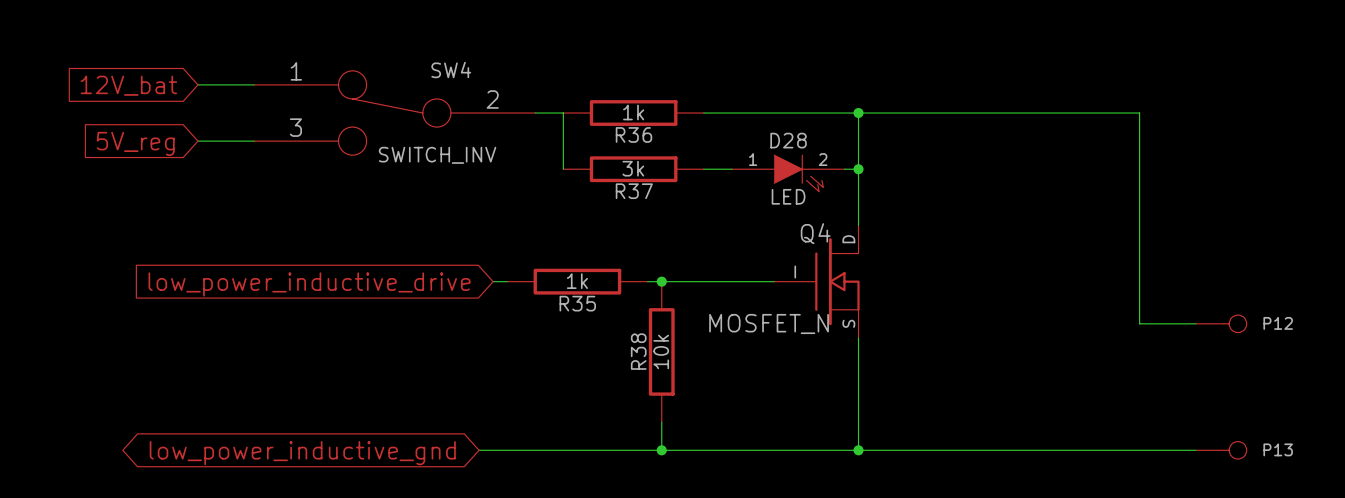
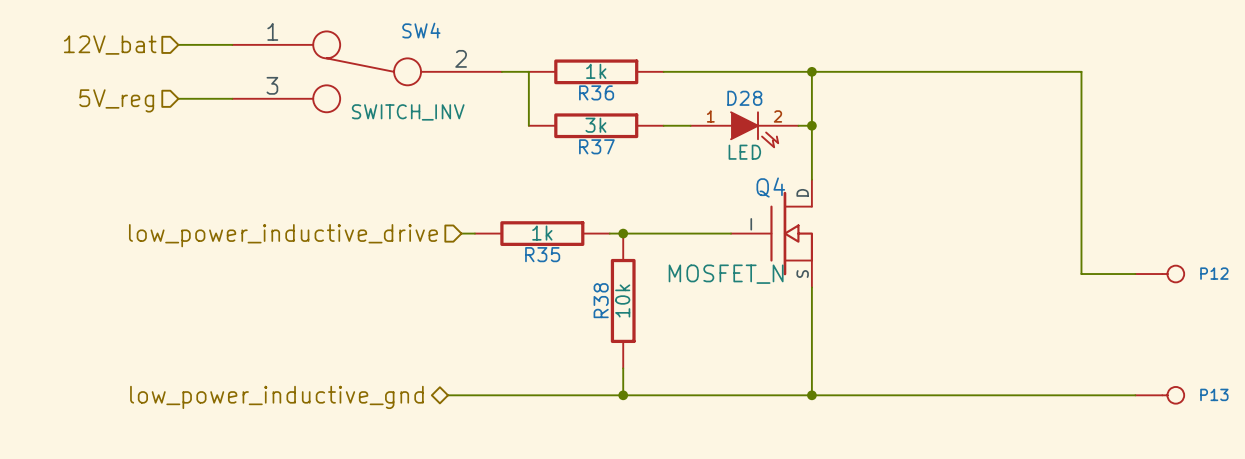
hierarchical label: none -> 12V_bat (110, 45)
global label: 12V_bat (128, 85) -> none
hierarchical label: none -> 5V_reg (116, 100)
global label: 5V_reg (135, 143) -> none
hierarchical label: none -> low_power_inductive_drive (283, 235)
global label: low_power_inductive_drive (309, 284) -> none
hierarchical label: none -> low_power_inductive_gnd (276, 397)
global label: low_power_inductive_gnd (302, 453) -> none

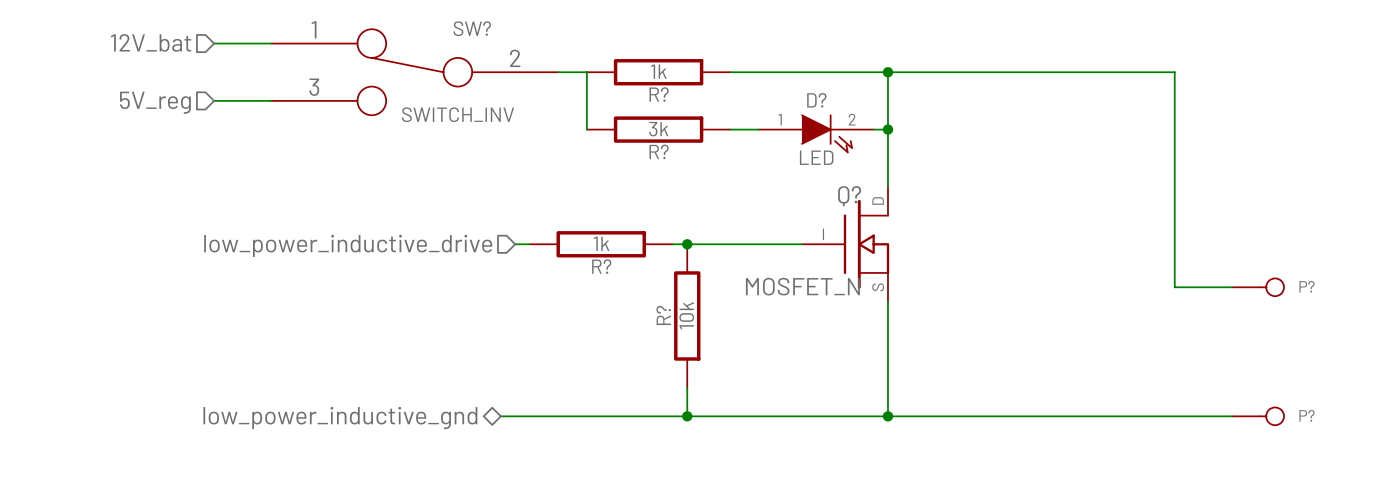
SW4 name: SW4 (421, 30) -> SW? (472, 28)
R36 name: R36 (596, 92) -> R? (659, 94)
D28 name: D28 (744, 98) -> D? (816, 100)
R37 name: R37 (596, 146) -> R? (659, 151)
Q4 name: Q4 (770, 187) -> Q? (849, 196)
R35 name: R35 (542, 254) -> R? (601, 266)
P12 name: P12 (1214, 273) -> P? (1307, 286)
R38 name: R38 (601, 300) -> R? (663, 315)
P13 name: P13 (1214, 394) -> P? (1307, 415)

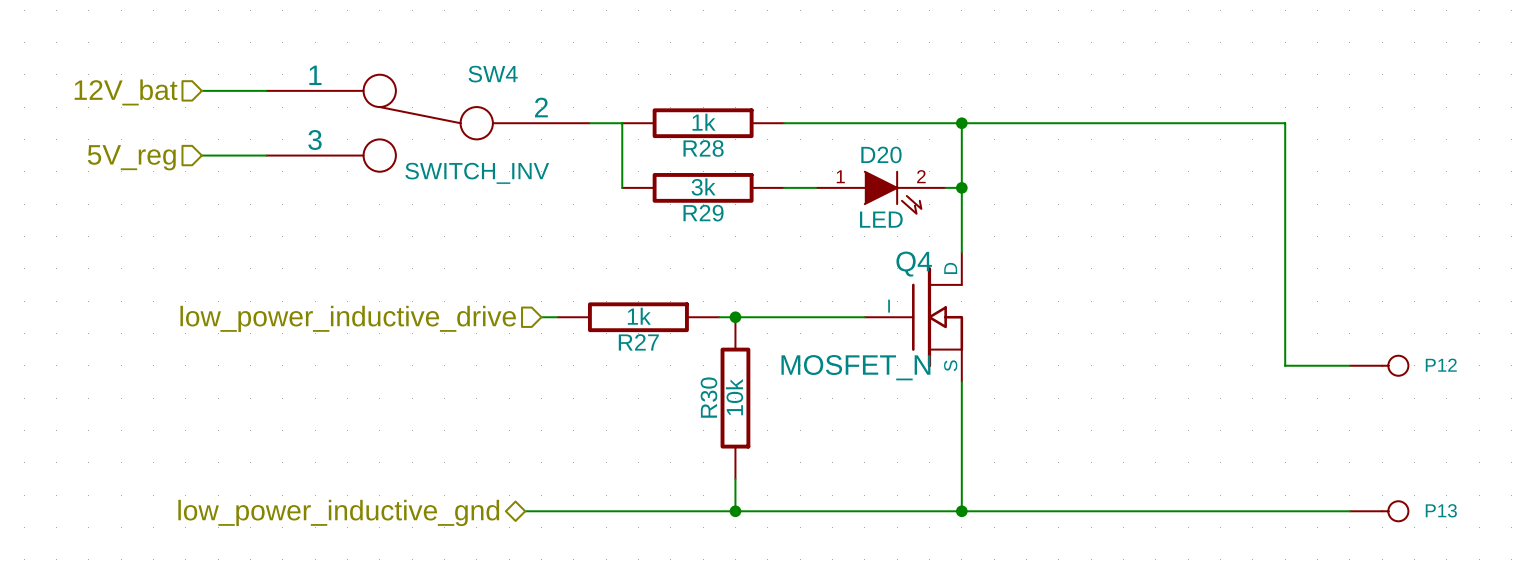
SW? name: SW? (472, 28) -> SW4 (493, 74)
R? name: R? (659, 94) -> R28 (703, 148)
D? name: D? (816, 100) -> D20 (881, 154)
R? name: R? (659, 151) -> R29 (703, 213)
Q? name: Q? (849, 196) -> Q4 (914, 264)
R? name: R? (601, 266) -> R27 (638, 342)
P? name: P? (1307, 286) -> P12 (1441, 365)
R? name: R? (663, 315) -> R30 (708, 397)
P? name: P? (1307, 415) -> P13 (1441, 510)

